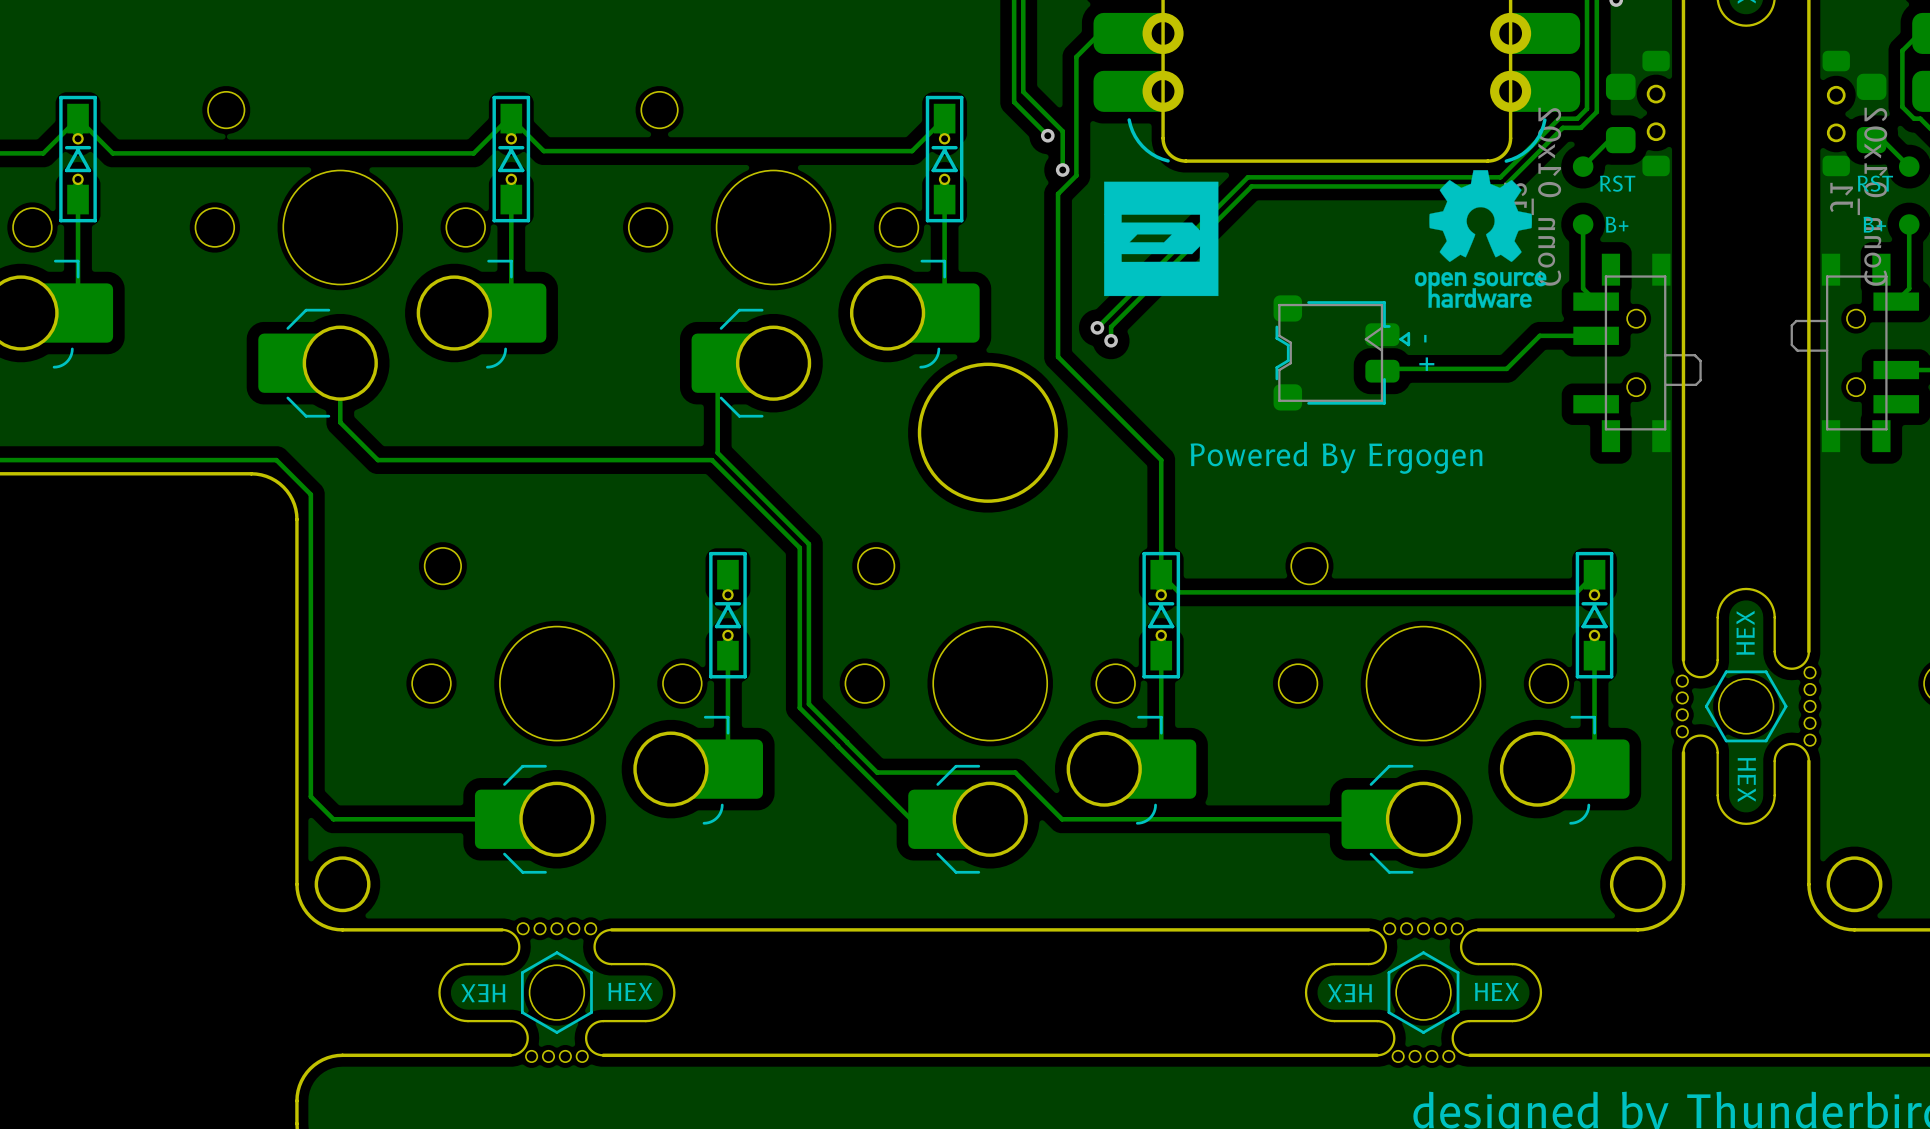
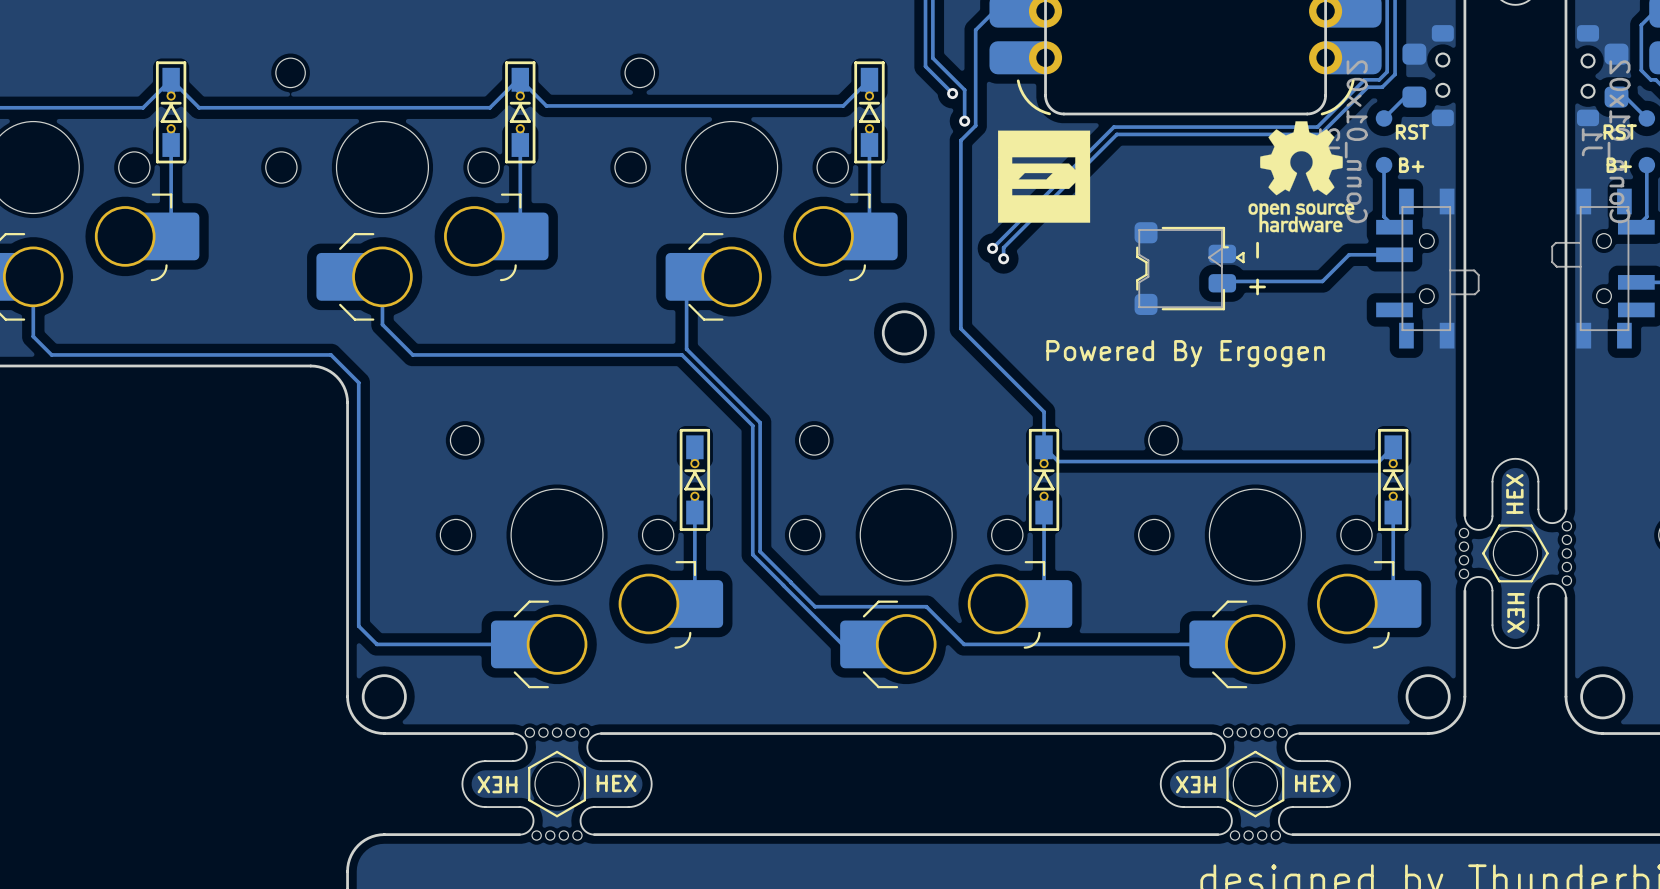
track: (1058, 356) (1161, 460) (1161, 530) -> (960, 271) (960, 328) (1044, 411)
round board edge size: [917, 362, 1059, 503] -> [881, 310, 927, 356]

